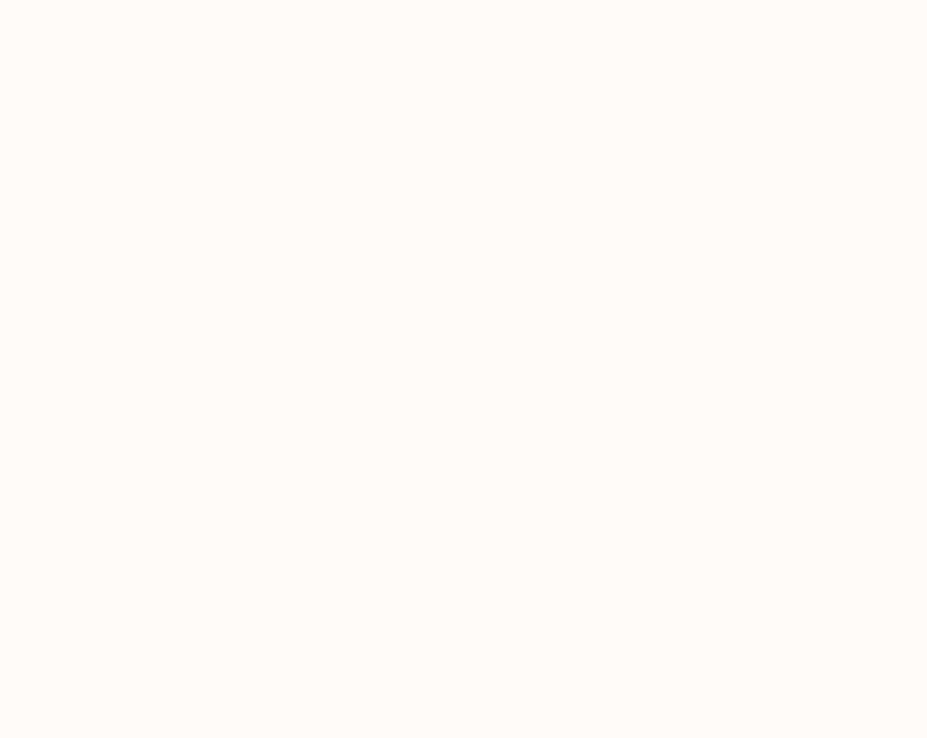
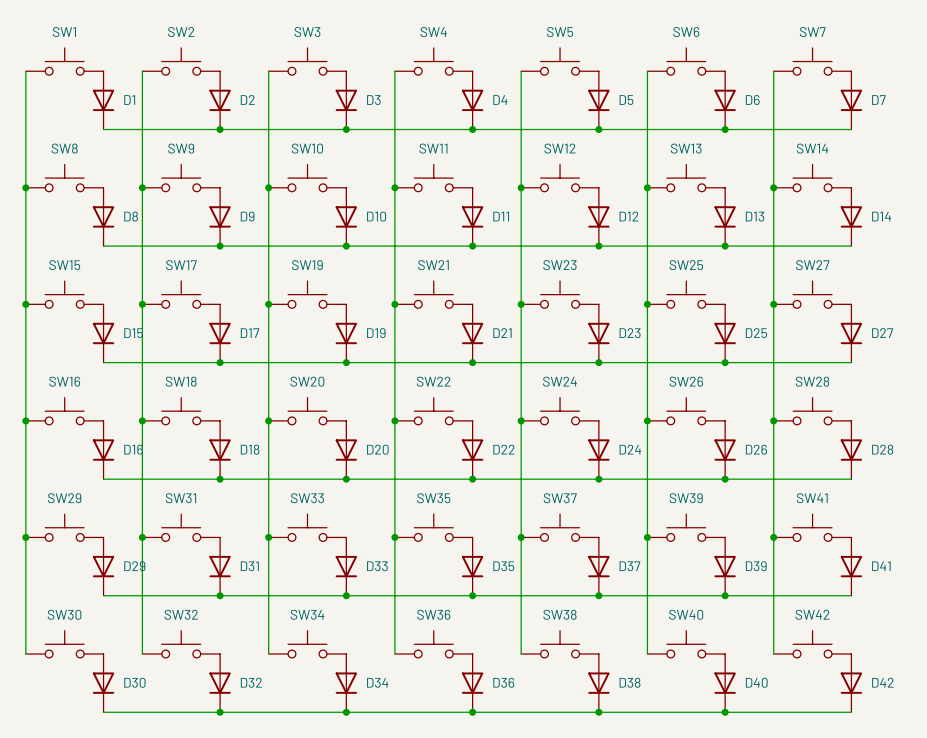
SW1: none -> (64, 61)
SW2: none -> (181, 61)
SW3: none -> (307, 61)
SW4: none -> (433, 61)
SW5: none -> (560, 61)
SW6: none -> (686, 61)
SW7: none -> (812, 61)
wire: none -> (25, 71) (25, 654)
wire: none -> (142, 71) (142, 654)
wire: none -> (268, 71) (268, 654)
wire: none -> (394, 71) (394, 654)
wire: none -> (521, 71) (521, 654)
wire: none -> (647, 71) (647, 654)
wire: none -> (773, 71) (773, 654)
D1: none -> (103, 100)
D2: none -> (220, 100)
D3: none -> (346, 100)
D4: none -> (472, 100)
D5: none -> (598, 100)
D6: none -> (725, 100)
D7: none -> (851, 100)
wire: none -> (103, 129) (851, 129)
junction: none -> (220, 129)
junction: none -> (346, 129)
junction: none -> (472, 129)
junction: none -> (598, 129)
junction: none -> (725, 129)
SW8: none -> (64, 178)
SW9: none -> (181, 178)
SW10: none -> (307, 178)
SW11: none -> (433, 178)
SW12: none -> (560, 178)
SW13: none -> (686, 178)
SW14: none -> (812, 178)
junction: none -> (25, 187)
junction: none -> (142, 187)
junction: none -> (268, 187)
junction: none -> (394, 187)
junction: none -> (521, 187)
junction: none -> (647, 187)
junction: none -> (773, 187)
D8: none -> (103, 216)
D9: none -> (220, 216)
D10: none -> (346, 216)
D11: none -> (472, 216)
D12: none -> (598, 216)
D13: none -> (725, 216)
D14: none -> (851, 216)
wire: none -> (103, 246) (851, 246)
junction: none -> (220, 246)
junction: none -> (346, 246)
junction: none -> (472, 246)
junction: none -> (598, 246)
junction: none -> (725, 246)
SW15: none -> (64, 294)
SW17: none -> (181, 294)
SW19: none -> (307, 294)
SW21: none -> (433, 294)
SW23: none -> (560, 294)
SW25: none -> (686, 294)
SW27: none -> (812, 294)
junction: none -> (25, 304)
junction: none -> (142, 304)
junction: none -> (268, 304)
junction: none -> (394, 304)
junction: none -> (521, 304)
junction: none -> (647, 304)
junction: none -> (773, 304)
D15: none -> (103, 333)
D17: none -> (220, 333)
D19: none -> (346, 333)
D21: none -> (472, 333)
D23: none -> (598, 333)
D25: none -> (725, 333)
D27: none -> (851, 333)
wire: none -> (103, 362) (851, 362)
junction: none -> (220, 362)
junction: none -> (346, 362)
junction: none -> (472, 362)
junction: none -> (598, 362)
junction: none -> (725, 362)
SW16: none -> (64, 411)
SW18: none -> (181, 411)
SW20: none -> (307, 411)
SW22: none -> (433, 411)
SW24: none -> (560, 411)
SW26: none -> (686, 411)
SW28: none -> (812, 411)
junction: none -> (25, 420)
junction: none -> (142, 420)
junction: none -> (268, 420)
junction: none -> (394, 420)
junction: none -> (521, 420)
junction: none -> (647, 420)
junction: none -> (773, 420)
D16: none -> (103, 450)
D18: none -> (220, 450)
D20: none -> (346, 450)
D22: none -> (472, 450)
D24: none -> (598, 450)
D26: none -> (725, 450)
D28: none -> (851, 450)
wire: none -> (103, 479) (851, 479)
junction: none -> (220, 479)
junction: none -> (346, 479)
junction: none -> (472, 479)
junction: none -> (598, 479)
junction: none -> (725, 479)
SW29: none -> (64, 527)
SW31: none -> (181, 527)
SW33: none -> (307, 527)
SW35: none -> (433, 527)
SW37: none -> (560, 527)
SW39: none -> (686, 527)
SW41: none -> (812, 527)
junction: none -> (25, 537)
junction: none -> (142, 537)
junction: none -> (268, 537)
junction: none -> (394, 537)
junction: none -> (521, 537)
junction: none -> (647, 537)
junction: none -> (773, 537)
D29: none -> (103, 566)
D31: none -> (220, 566)
D33: none -> (346, 566)
D35: none -> (472, 566)
D37: none -> (598, 566)
D39: none -> (725, 566)
D41: none -> (851, 566)
wire: none -> (103, 595) (851, 595)
junction: none -> (220, 595)
junction: none -> (346, 595)
junction: none -> (472, 595)
junction: none -> (598, 595)
junction: none -> (725, 595)
SW30: none -> (64, 644)
SW32: none -> (181, 644)
SW34: none -> (307, 644)
SW36: none -> (433, 644)
SW38: none -> (560, 644)
SW40: none -> (686, 644)
SW42: none -> (812, 644)
D30: none -> (103, 683)
D32: none -> (220, 683)
D34: none -> (346, 683)
D36: none -> (472, 683)
D38: none -> (598, 683)
D40: none -> (725, 683)
D42: none -> (851, 683)
wire: none -> (103, 712) (851, 712)
junction: none -> (220, 712)
junction: none -> (346, 712)
junction: none -> (472, 712)
junction: none -> (598, 712)
junction: none -> (725, 712)

